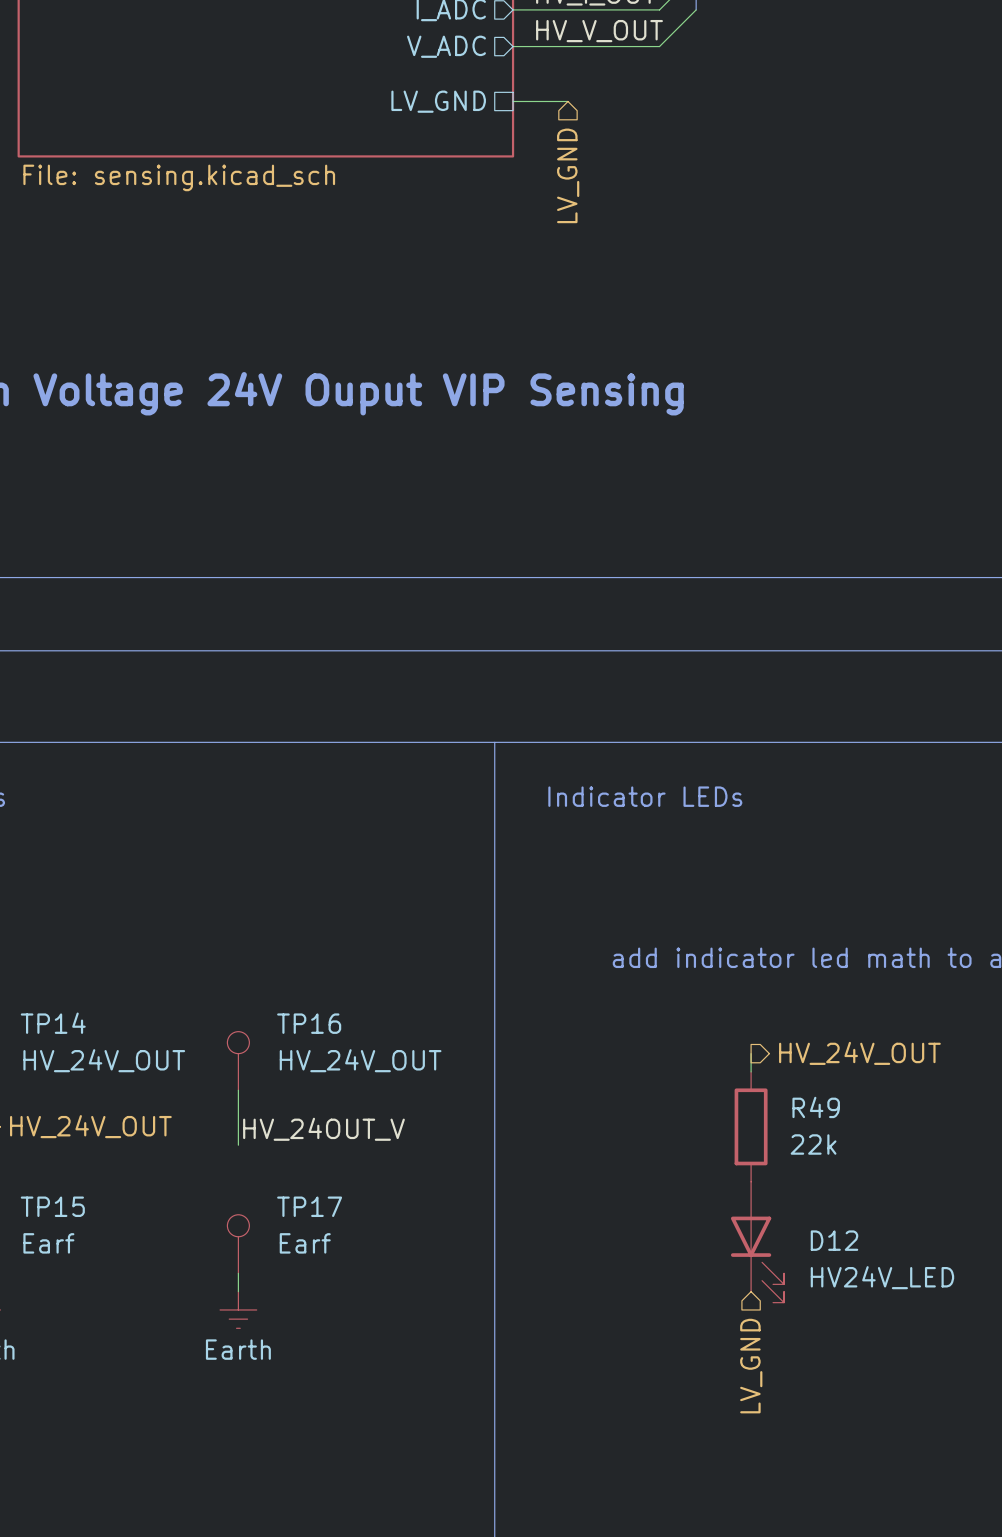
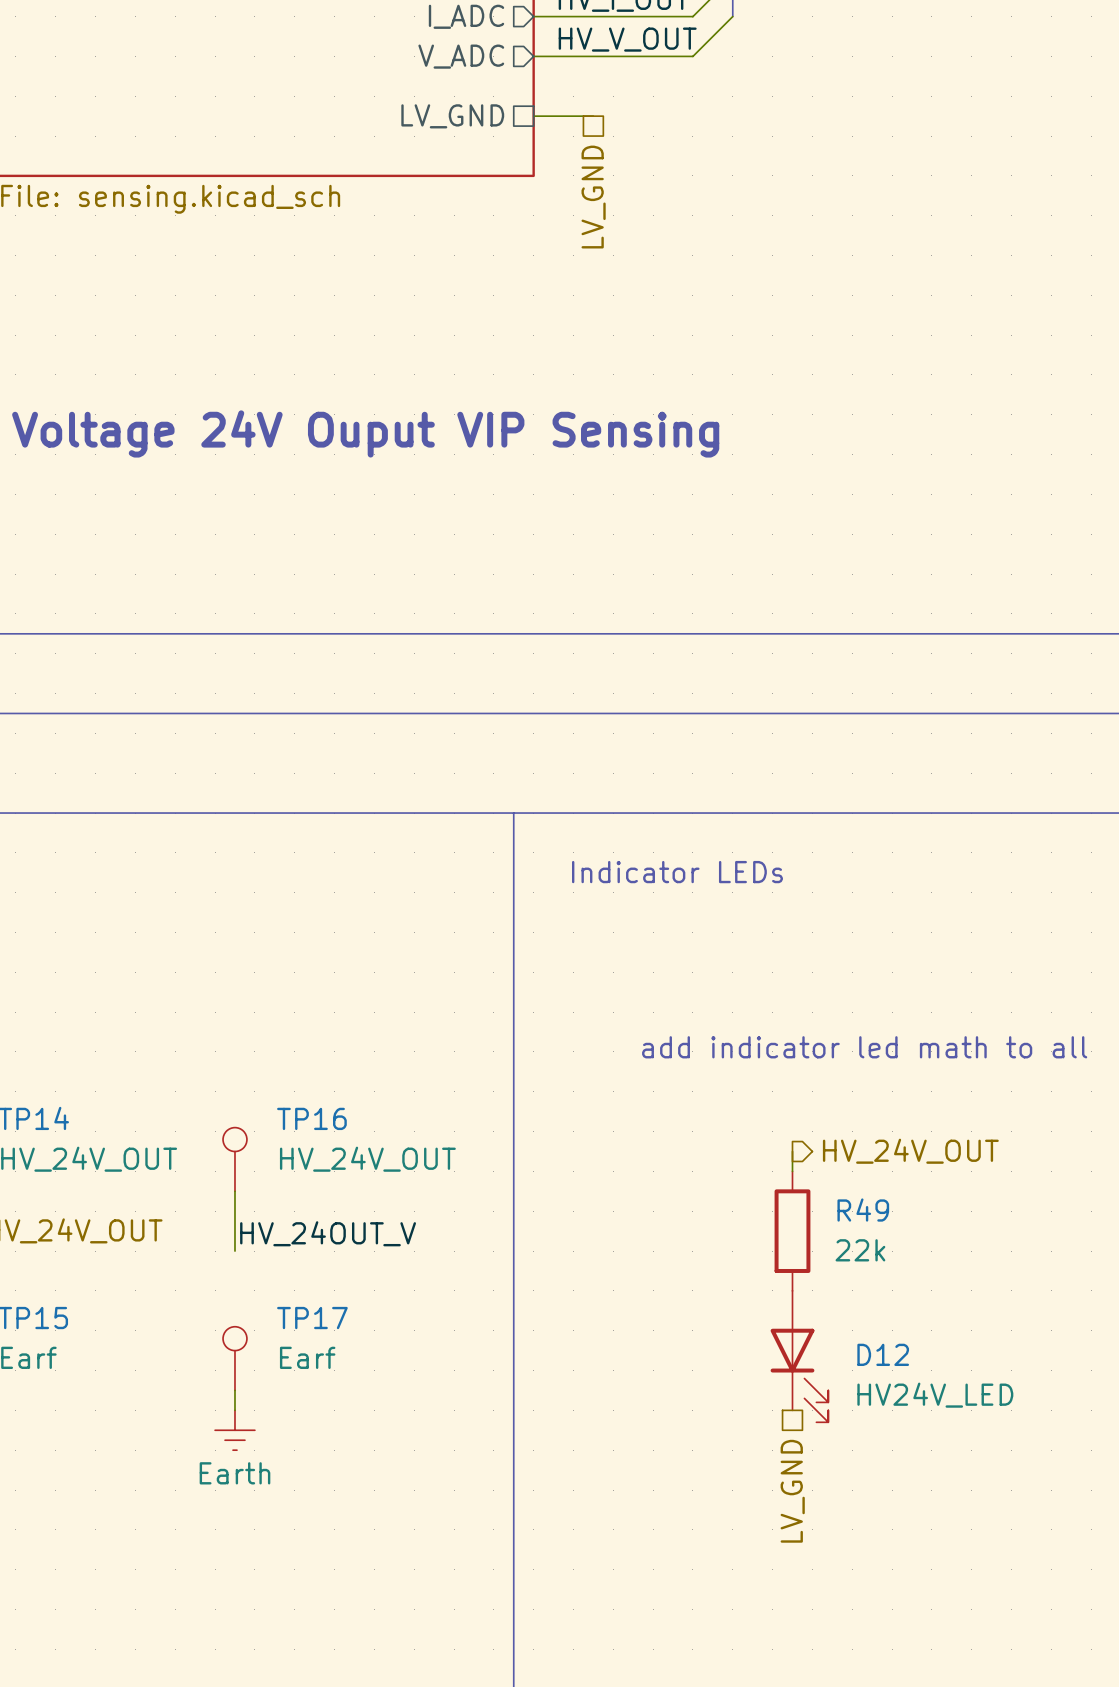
hierarchical label shape: input (568, 175) -> passive (593, 197)
hierarchical label shape: input (751, 1366) -> passive (792, 1491)

